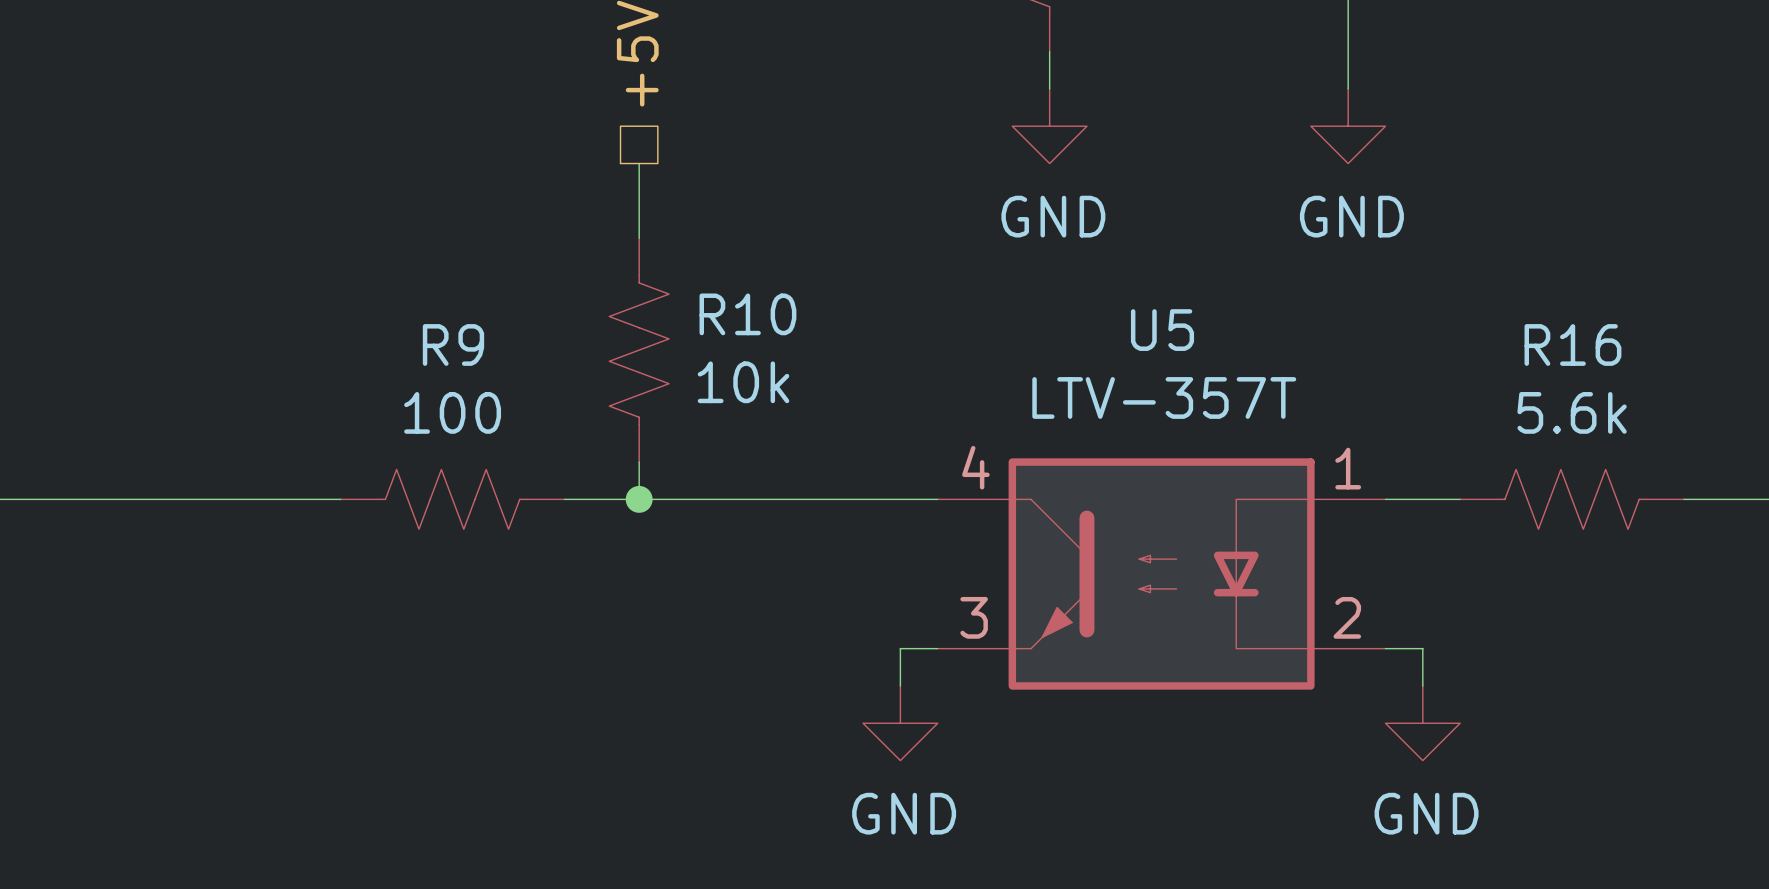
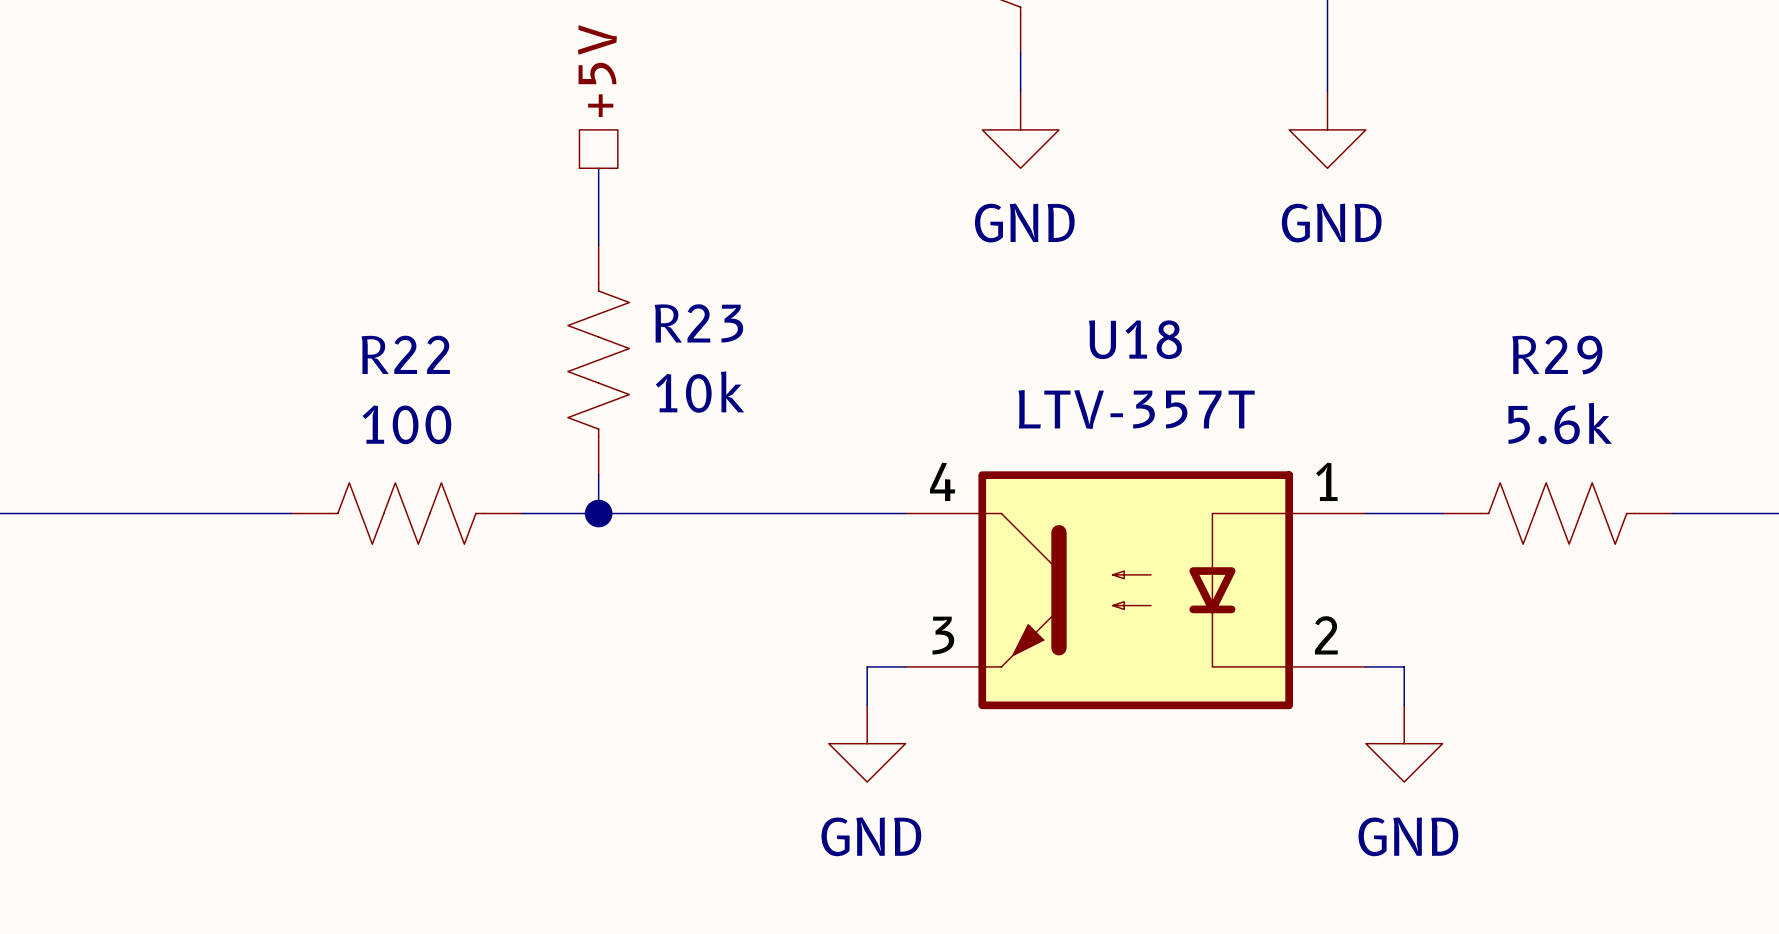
R10 name: R10 (747, 314) -> R23 (698, 323)
U5 name: U5 (1162, 330) -> U18 (1135, 339)
R9 name: R9 (453, 344) -> R22 (405, 354)
R16 name: R16 (1572, 344) -> R29 (1557, 355)

